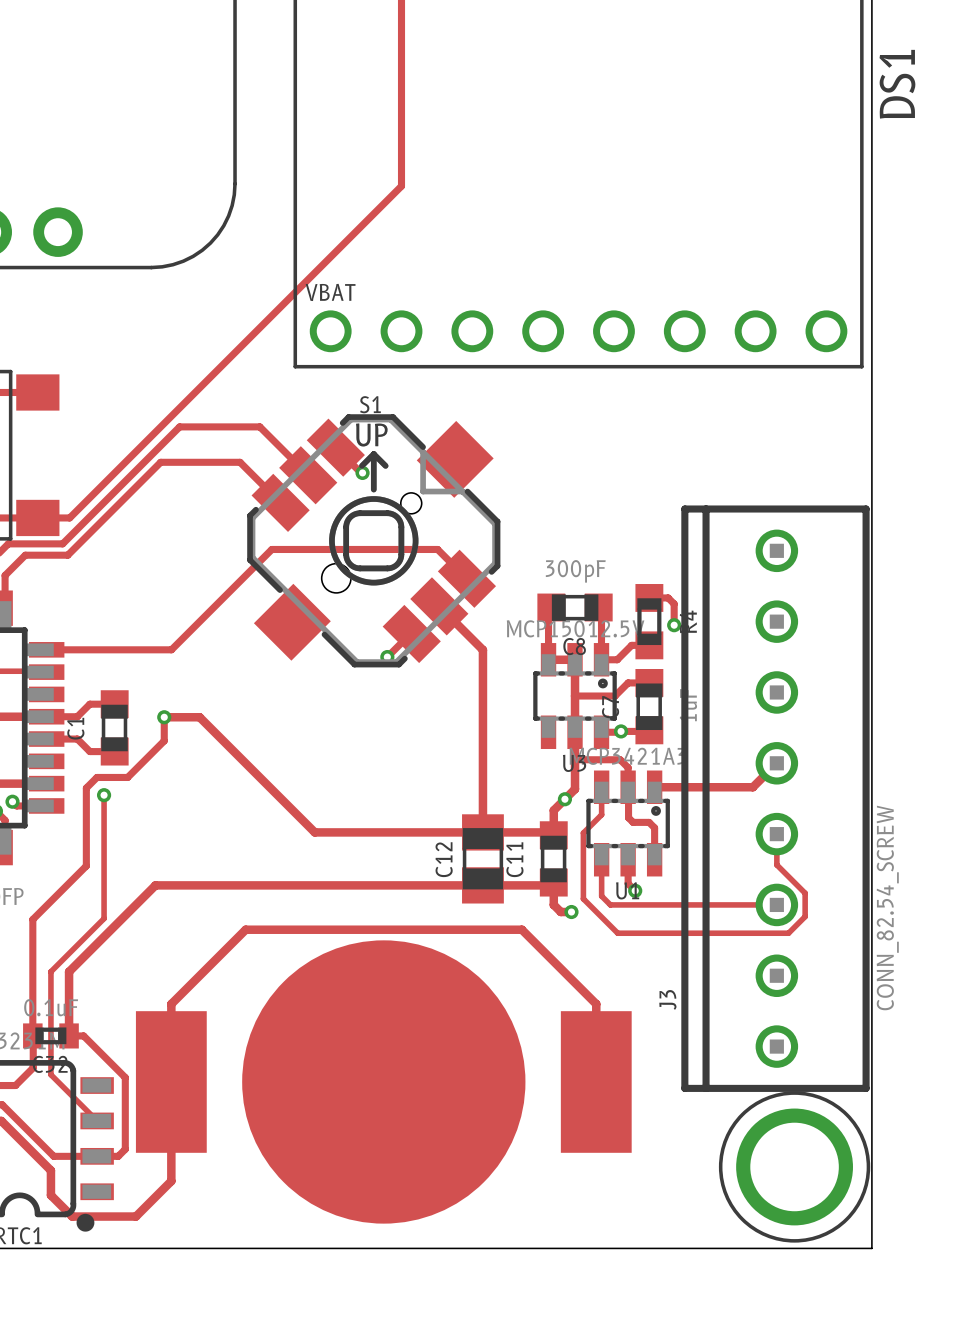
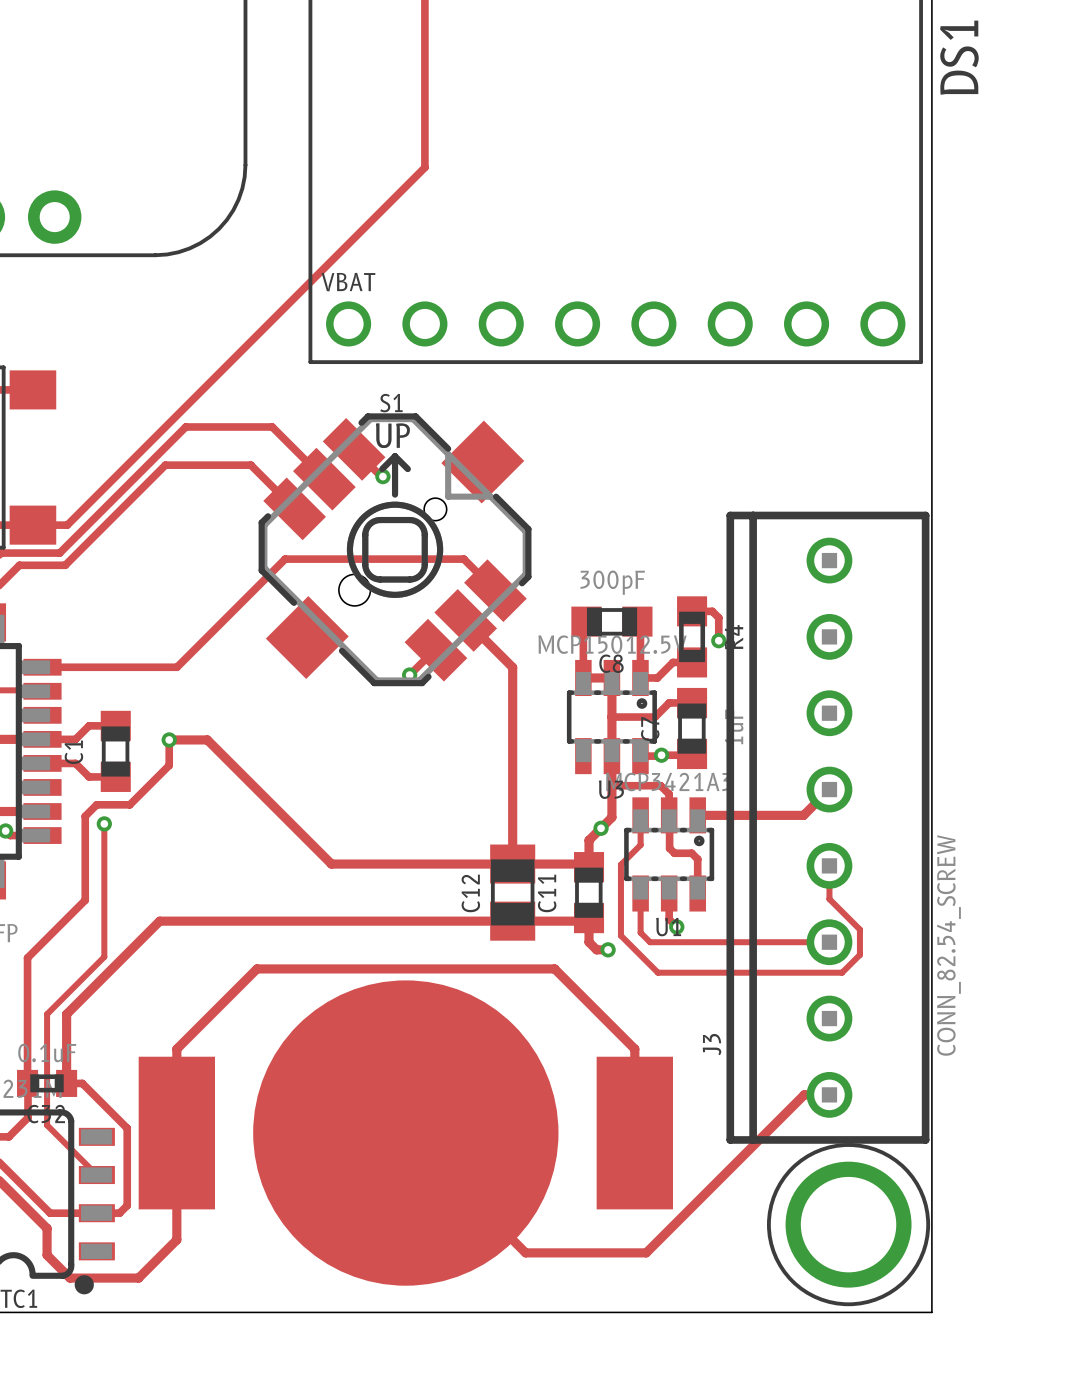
track: none -> (829, 1094) (804, 1094) (646, 1252) (525, 1252) (405, 1133)

